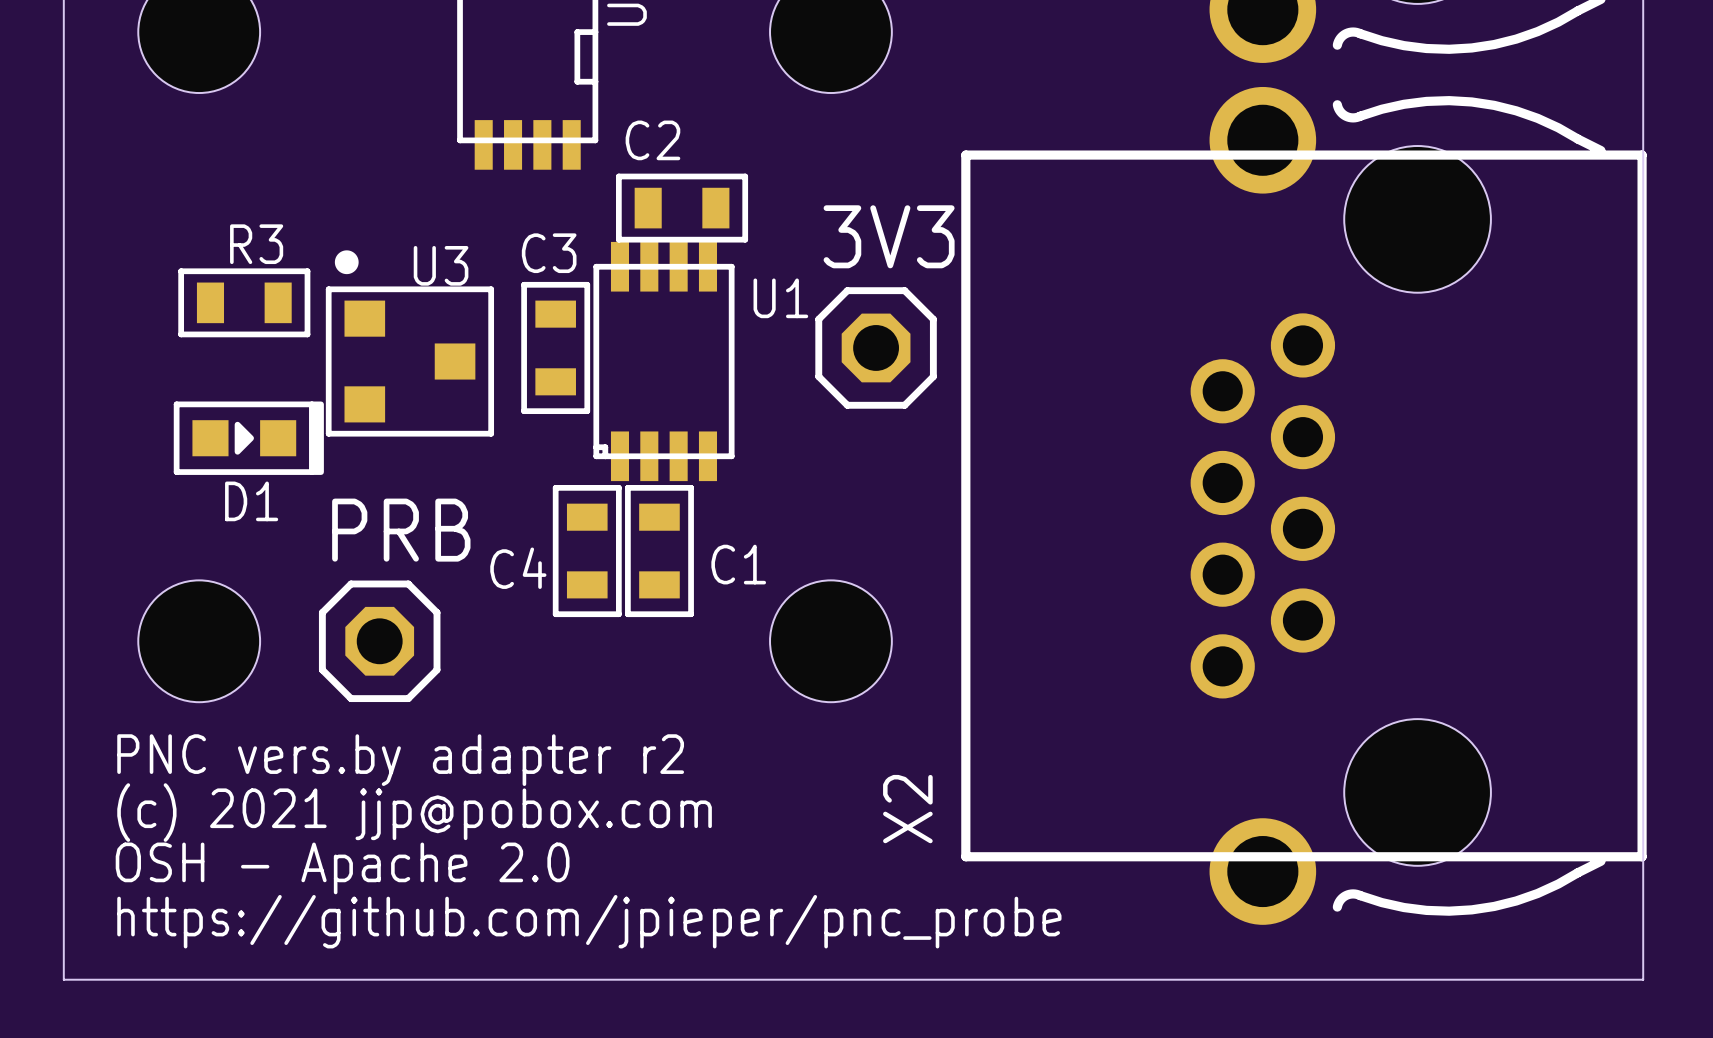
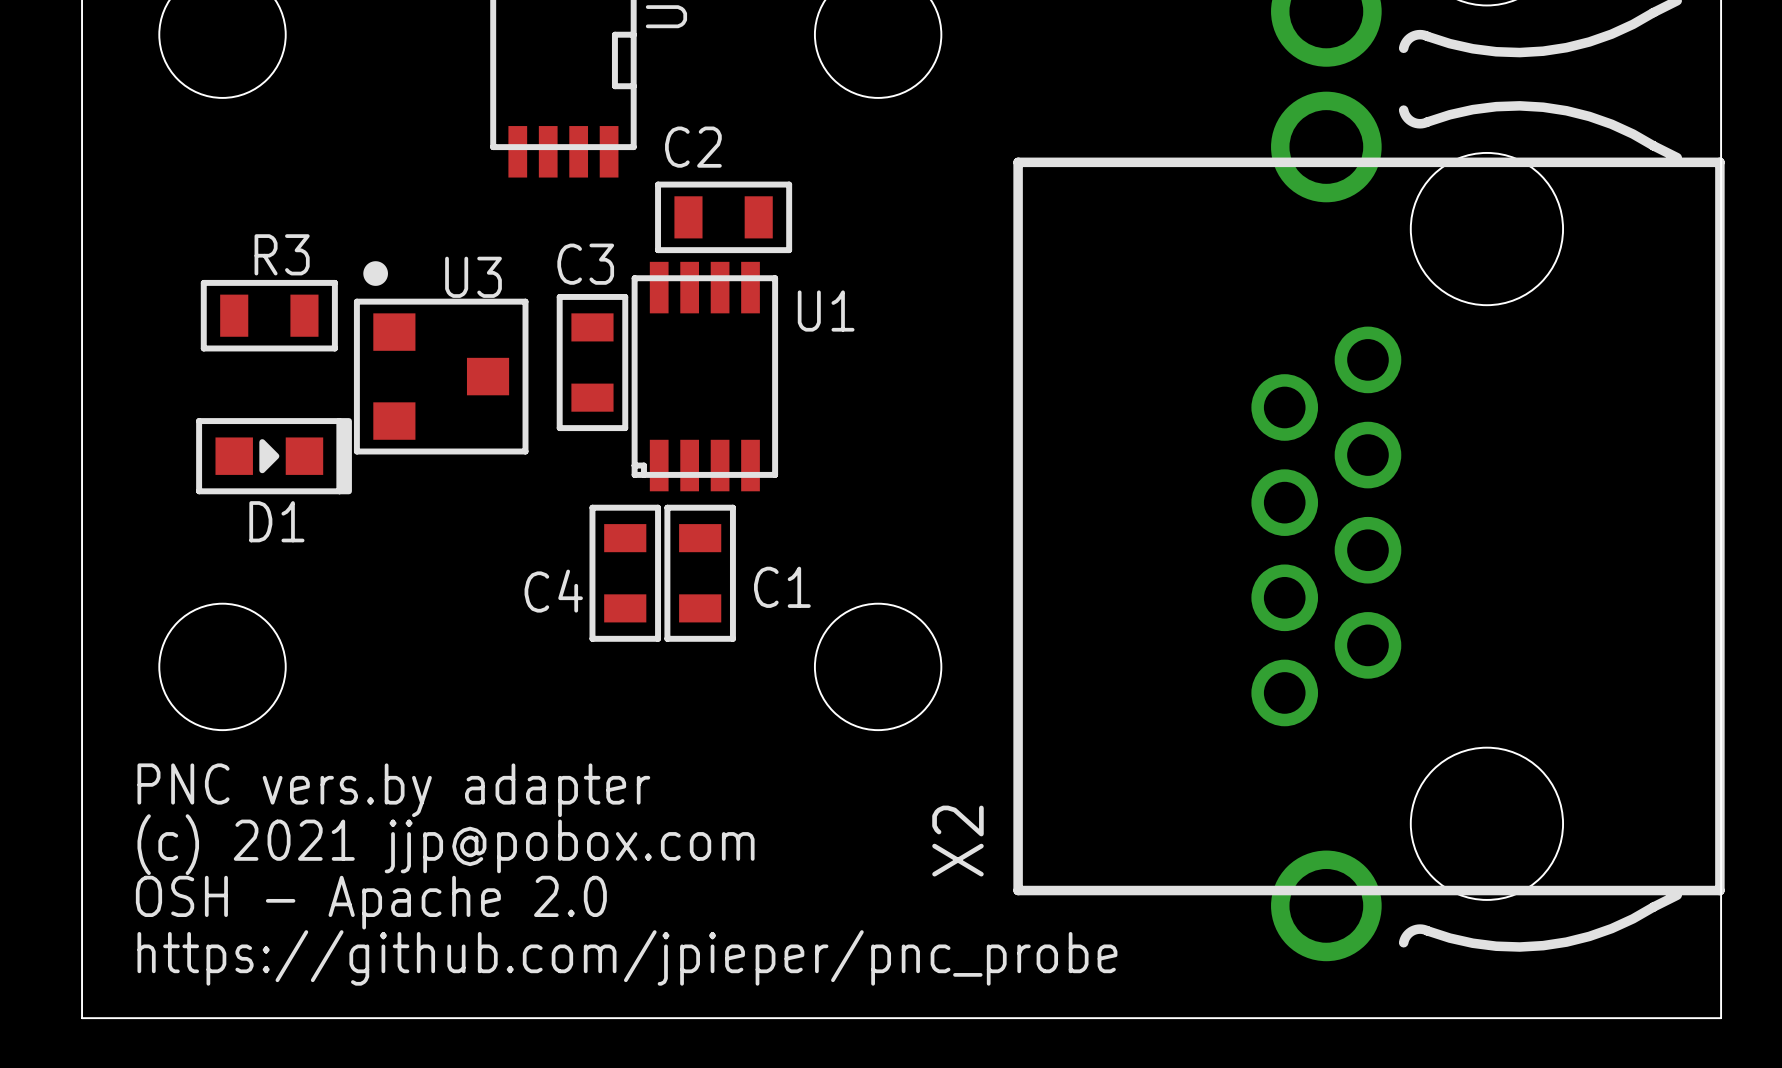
U1 footprint: [593, 241, 735, 482] -> [631, 261, 779, 492]
3V3: (876, 347) -> none
PRB: (379, 641) -> none
text: PNC vers.by adapter r2 (400, 760) -> PNC vers.by adapter (393, 790)

